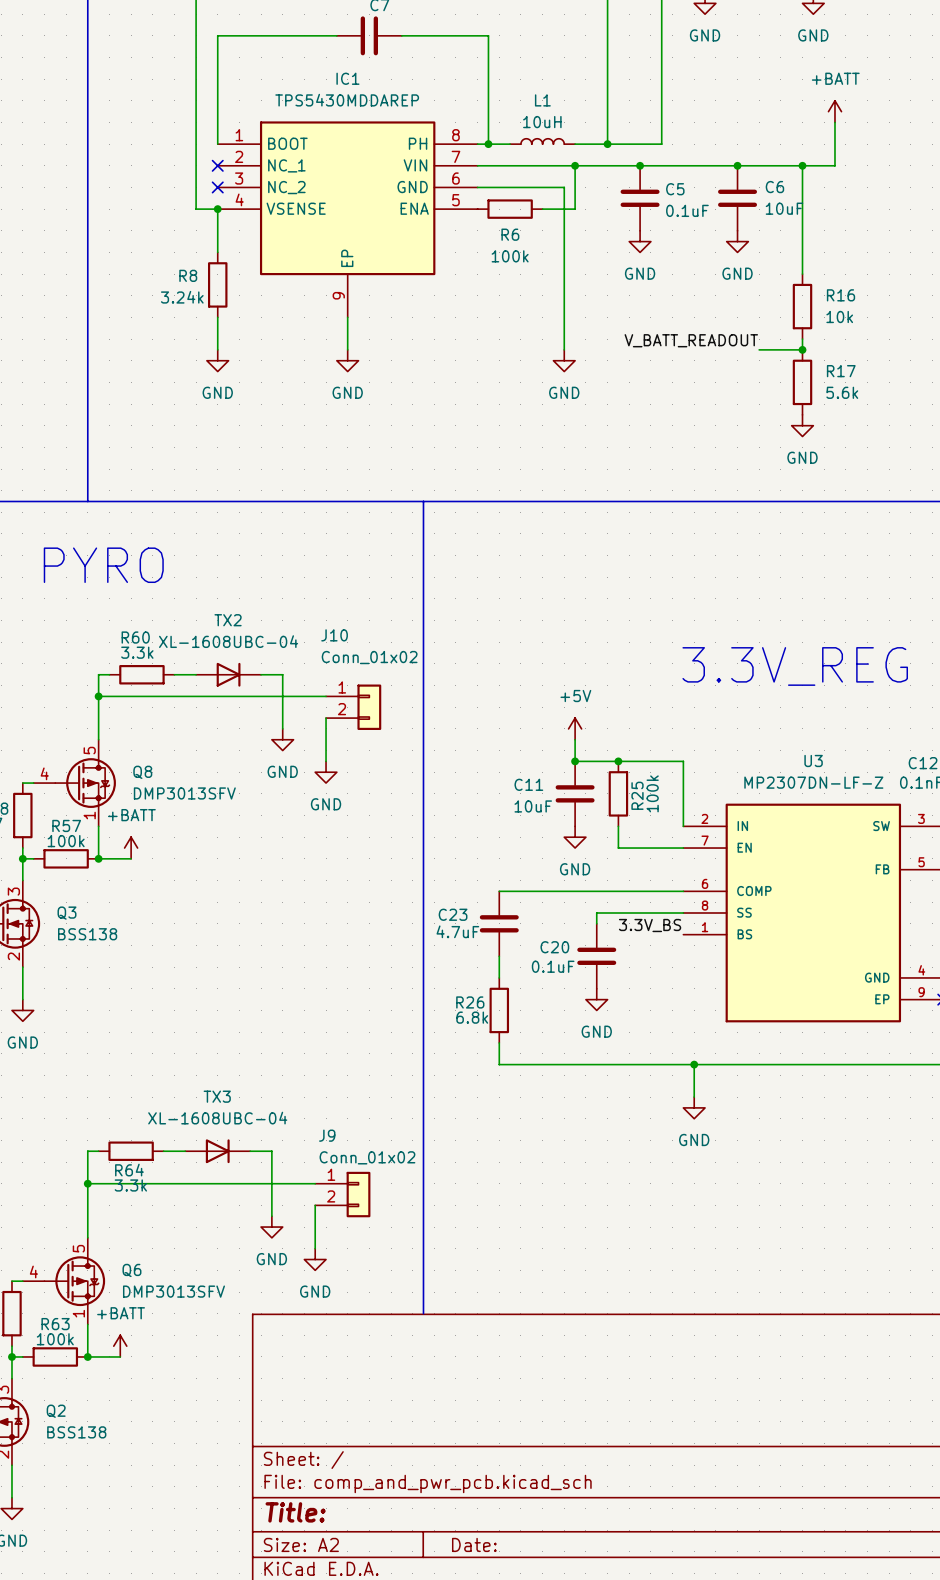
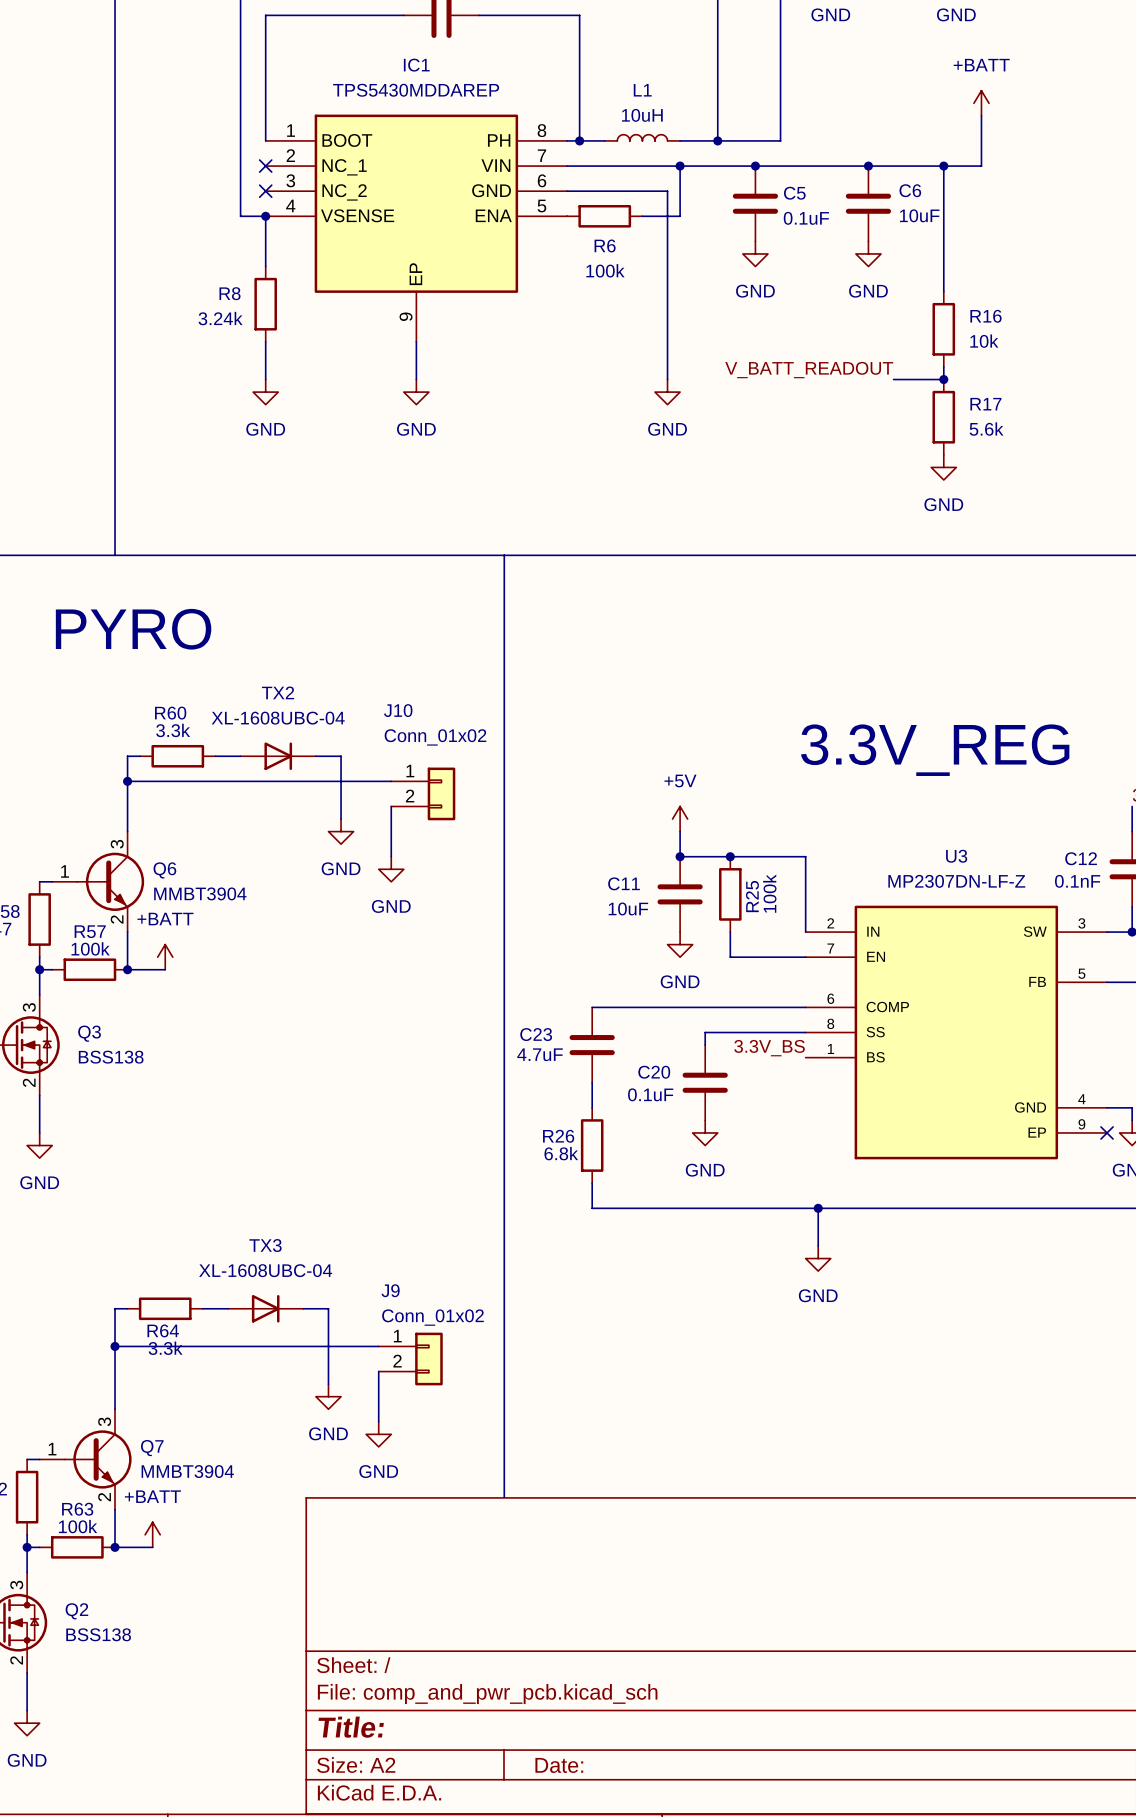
Q8: DMP3013SFV (74, 783) -> none
Q6 symbol: [22, 1237, 106, 1325] -> [52, 831, 145, 933]
Q7: none -> MMBT3904 (85, 1459)
Q6 value: DMP3013SFV (173, 1291) -> MMBT3904 (200, 893)

